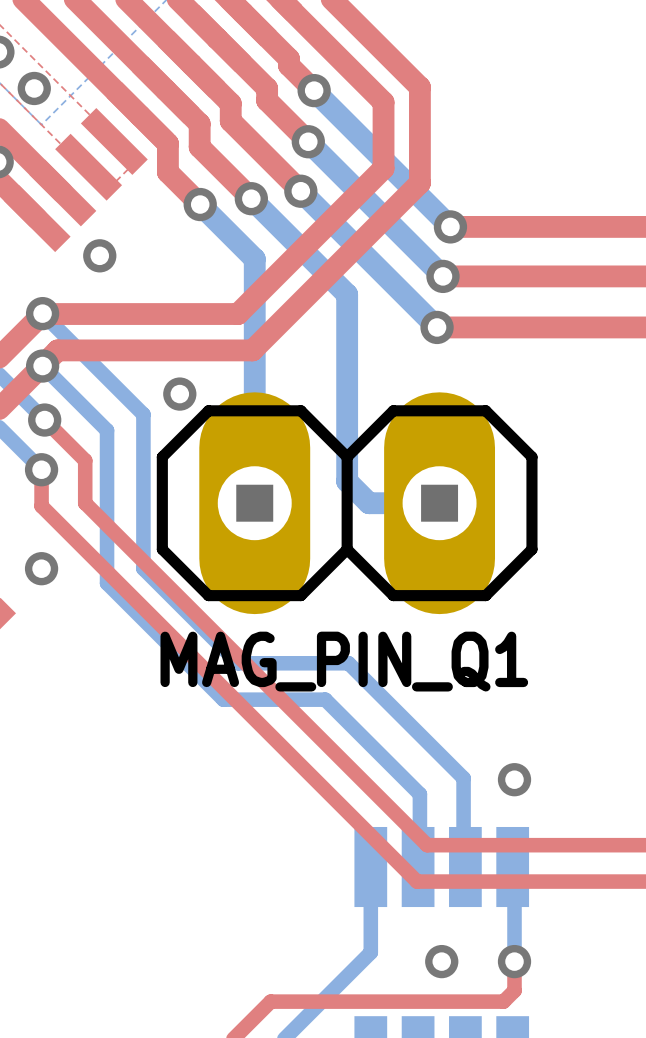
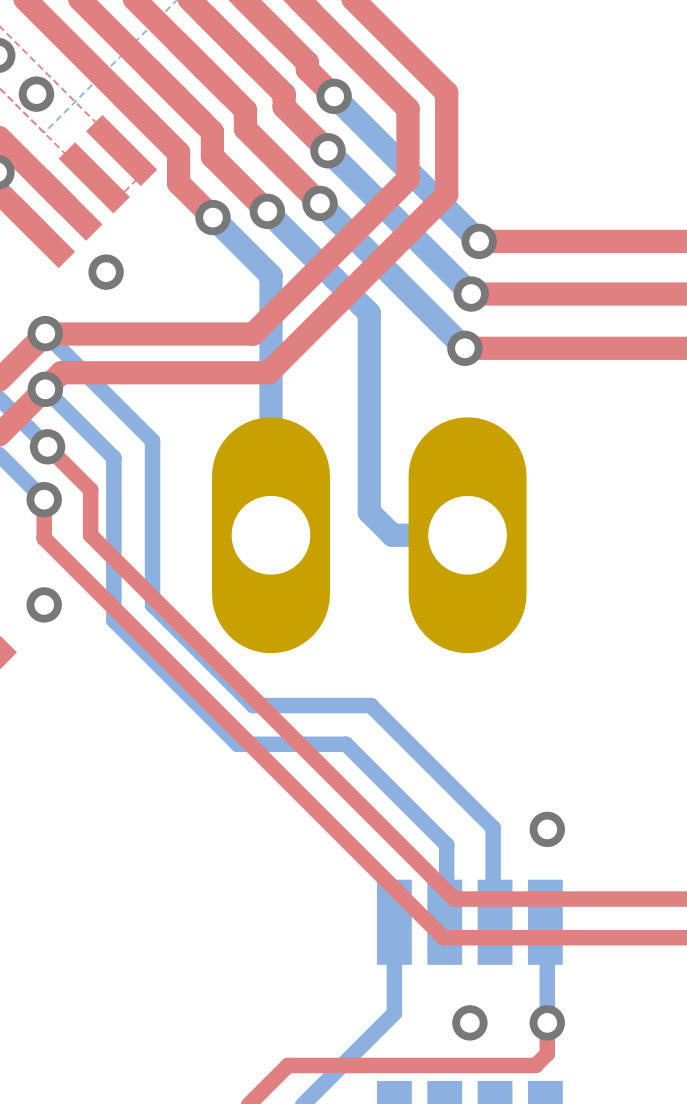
via: (179, 394) -> none
MAG_PIN_Q1 side: top (347, 503) -> bottom (369, 535)

